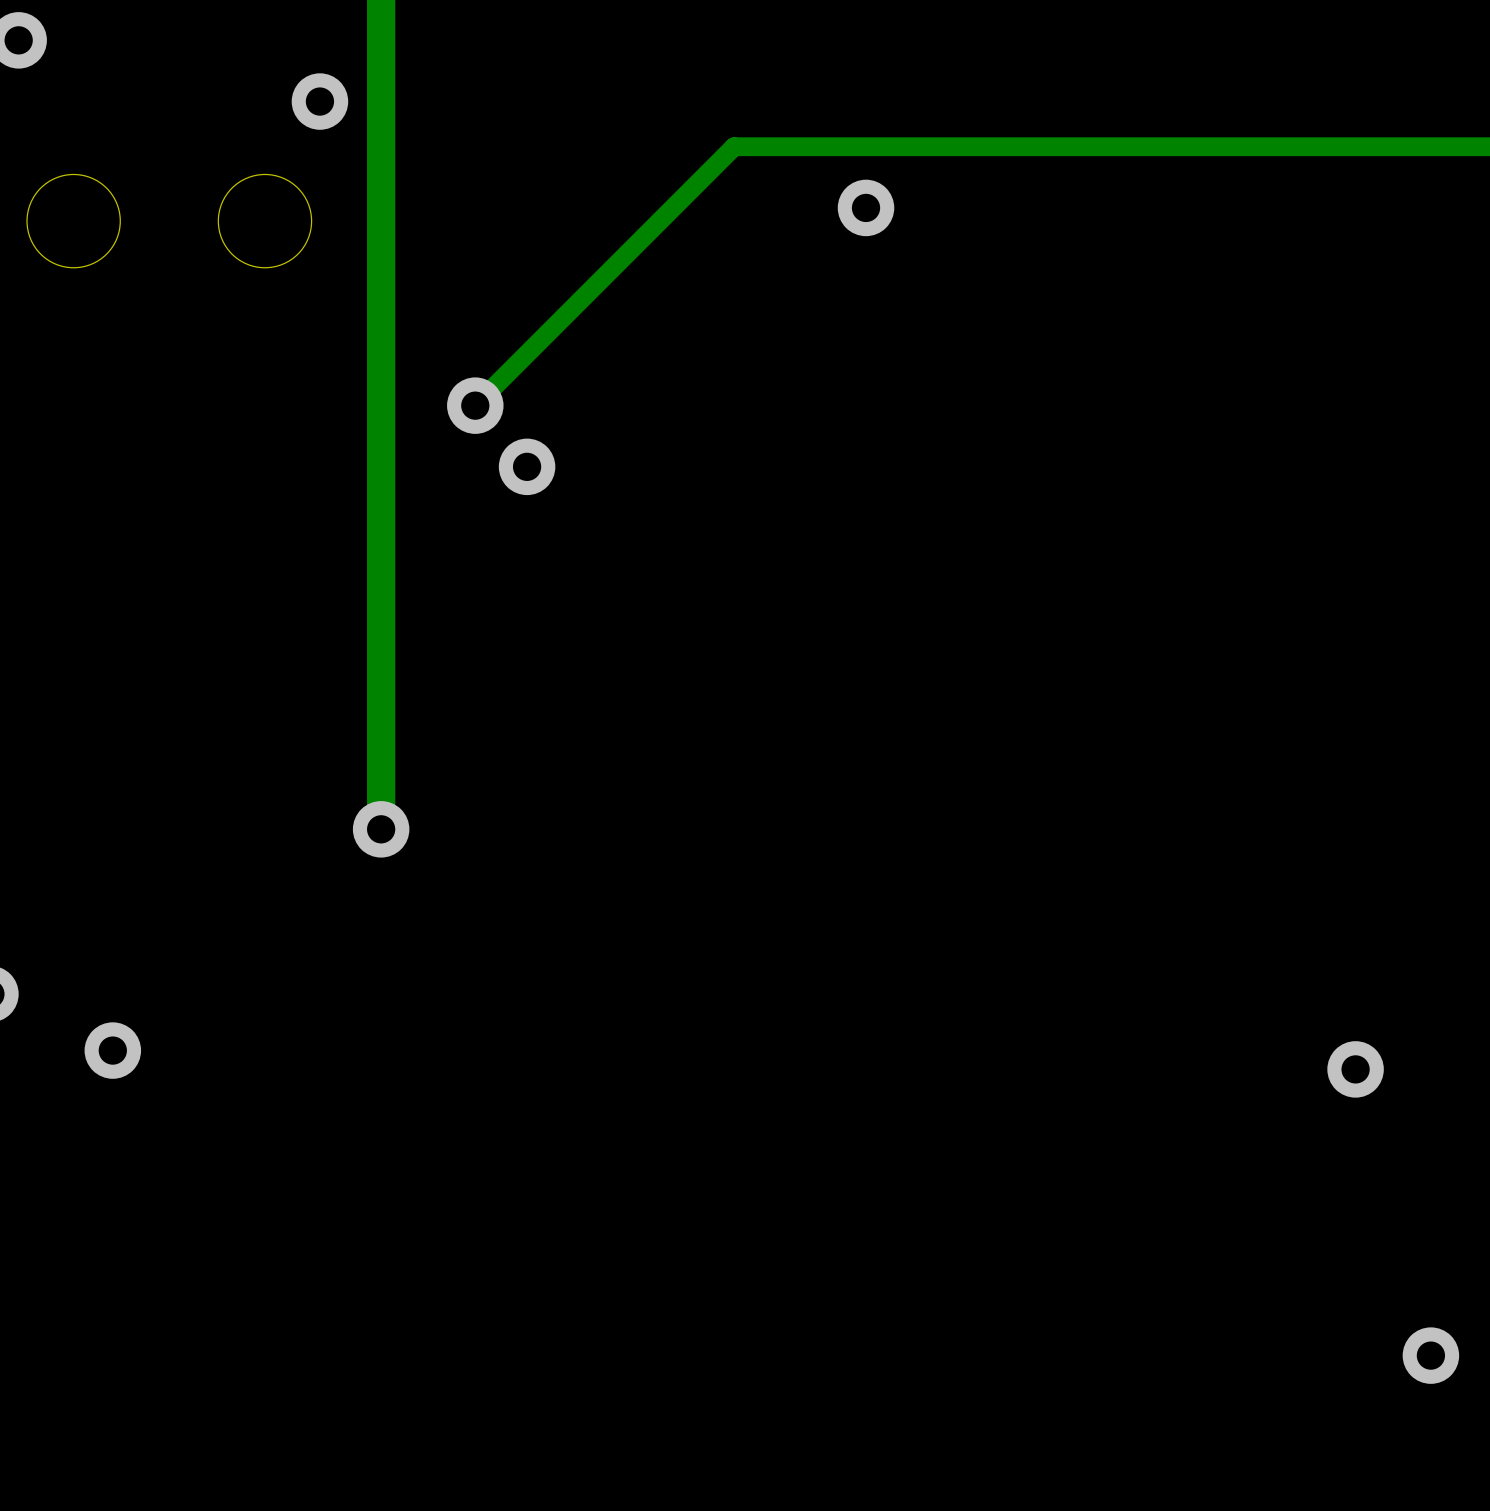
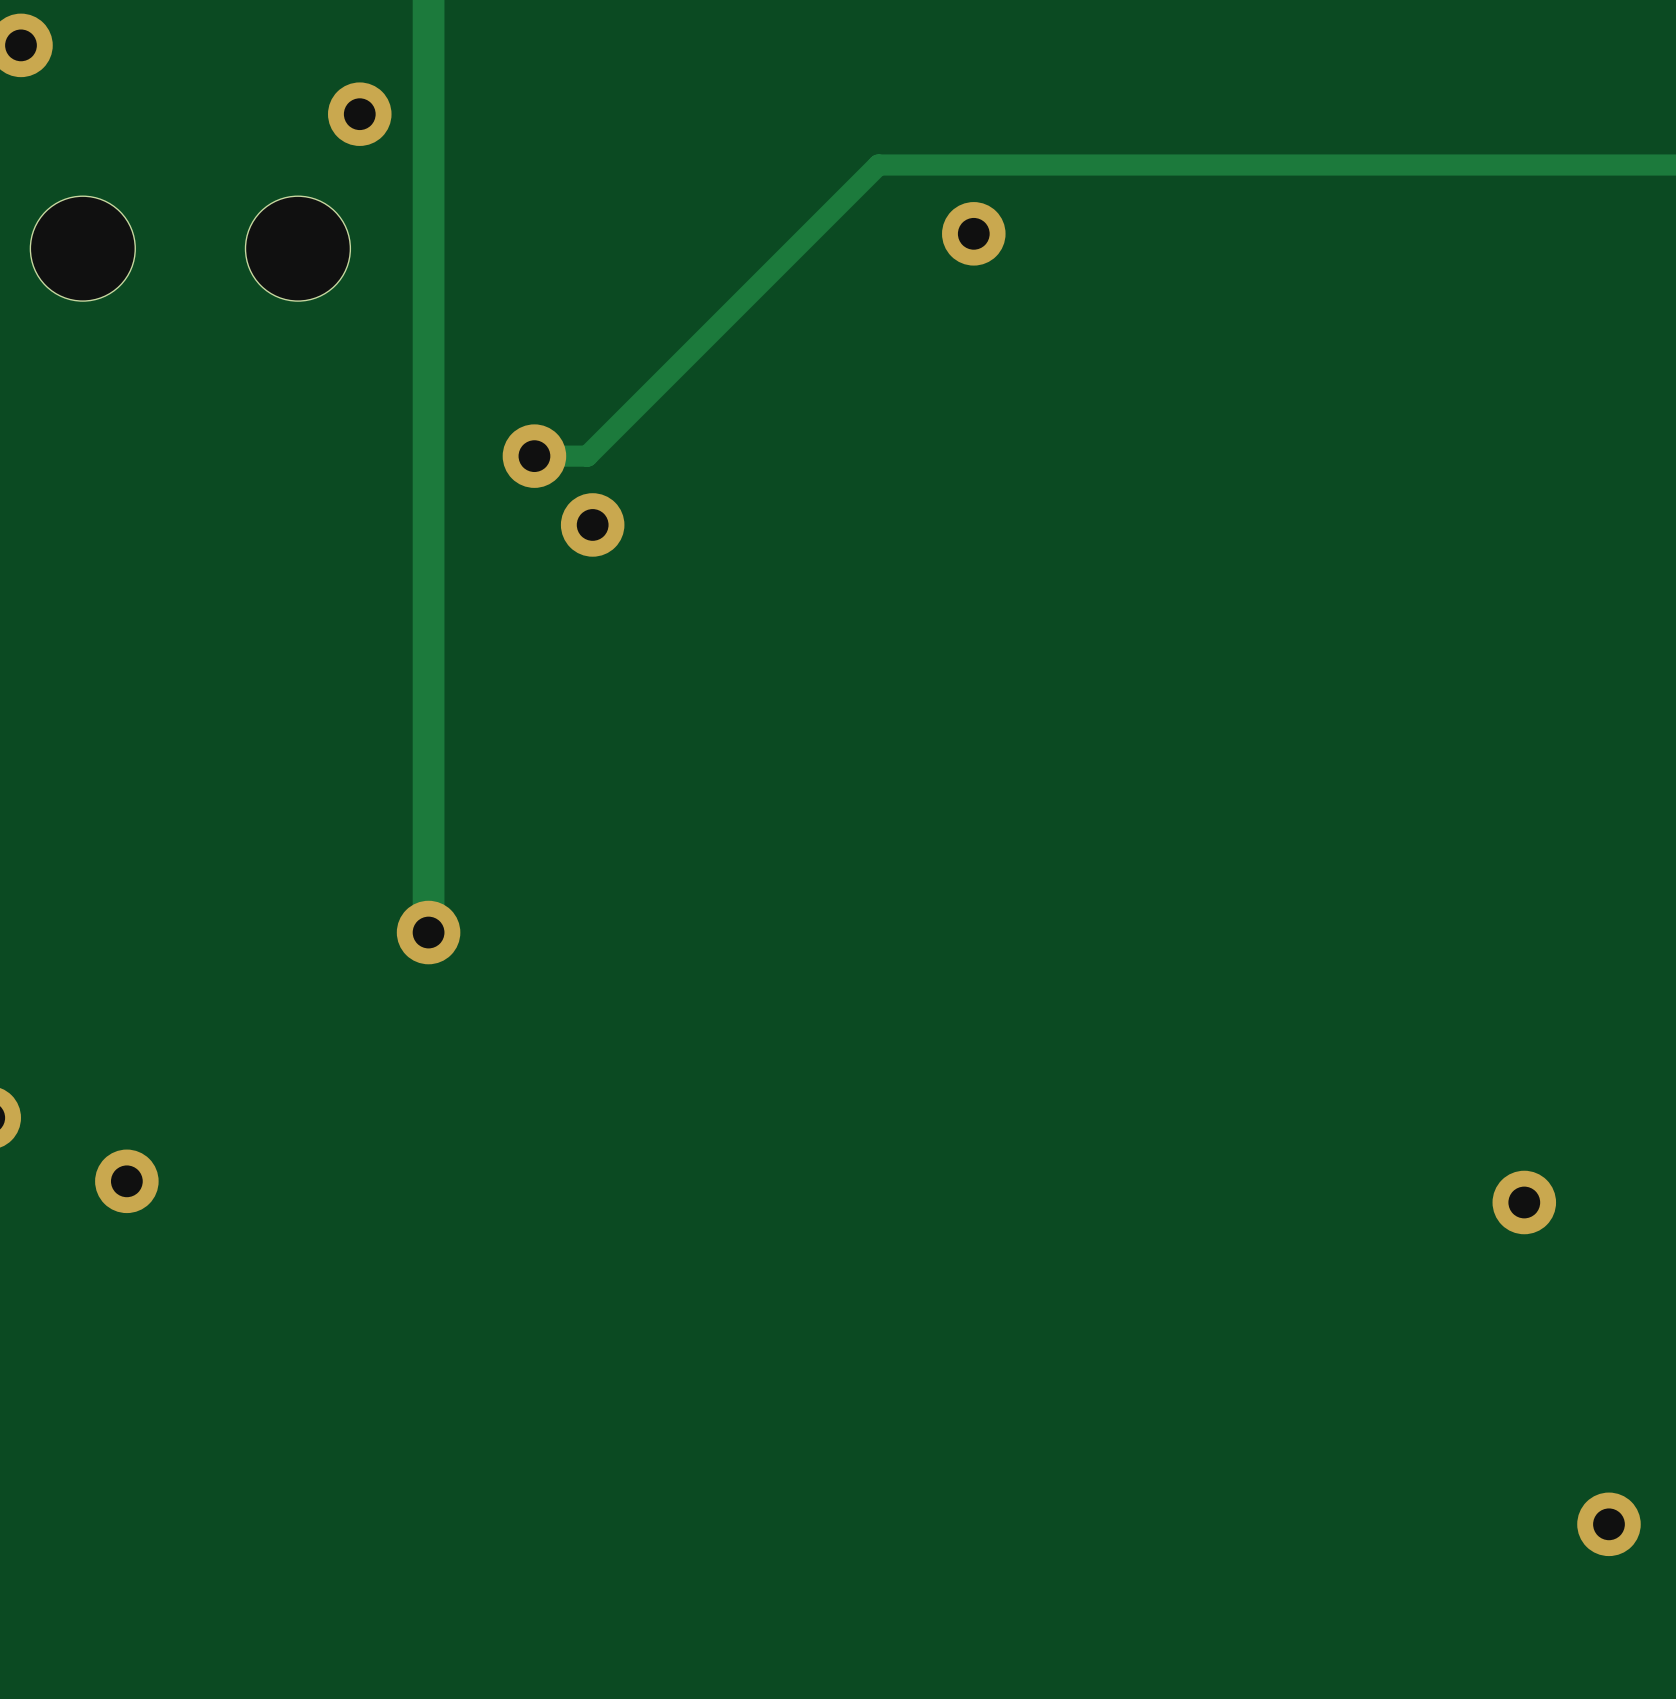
track: (781, 146) (734, 146) (475, 405) -> (878, 165) (587, 456) (534, 456)

